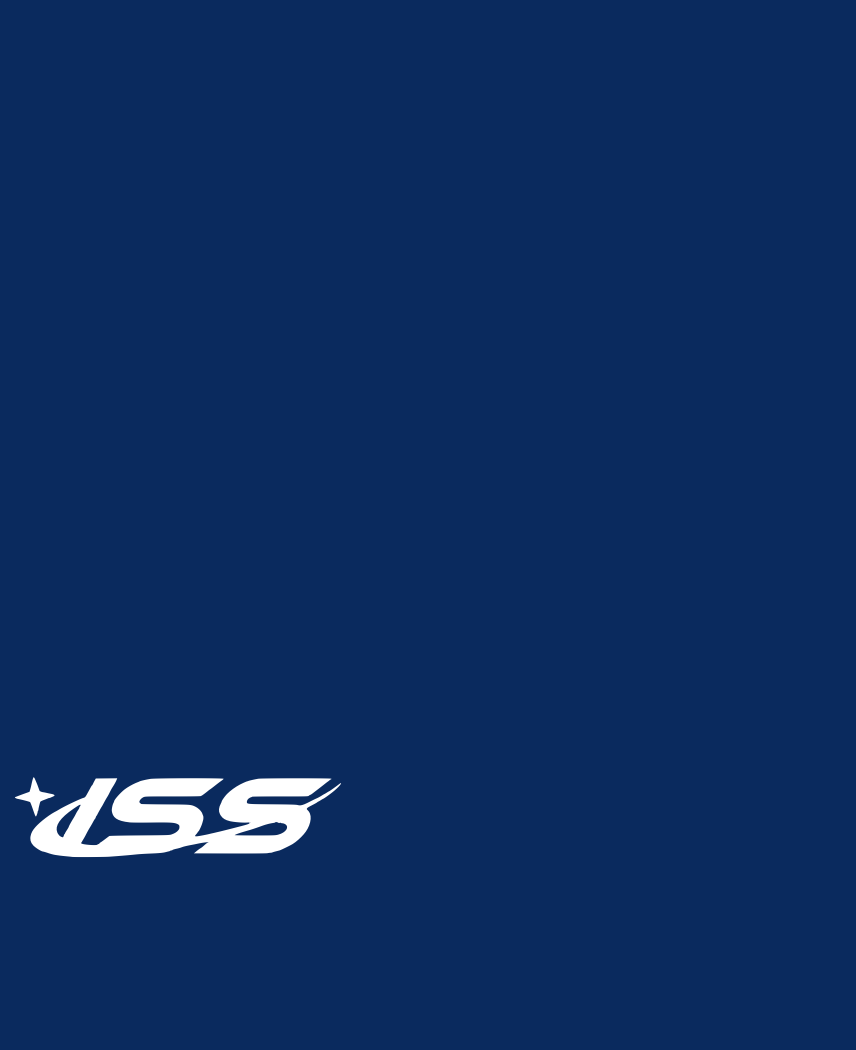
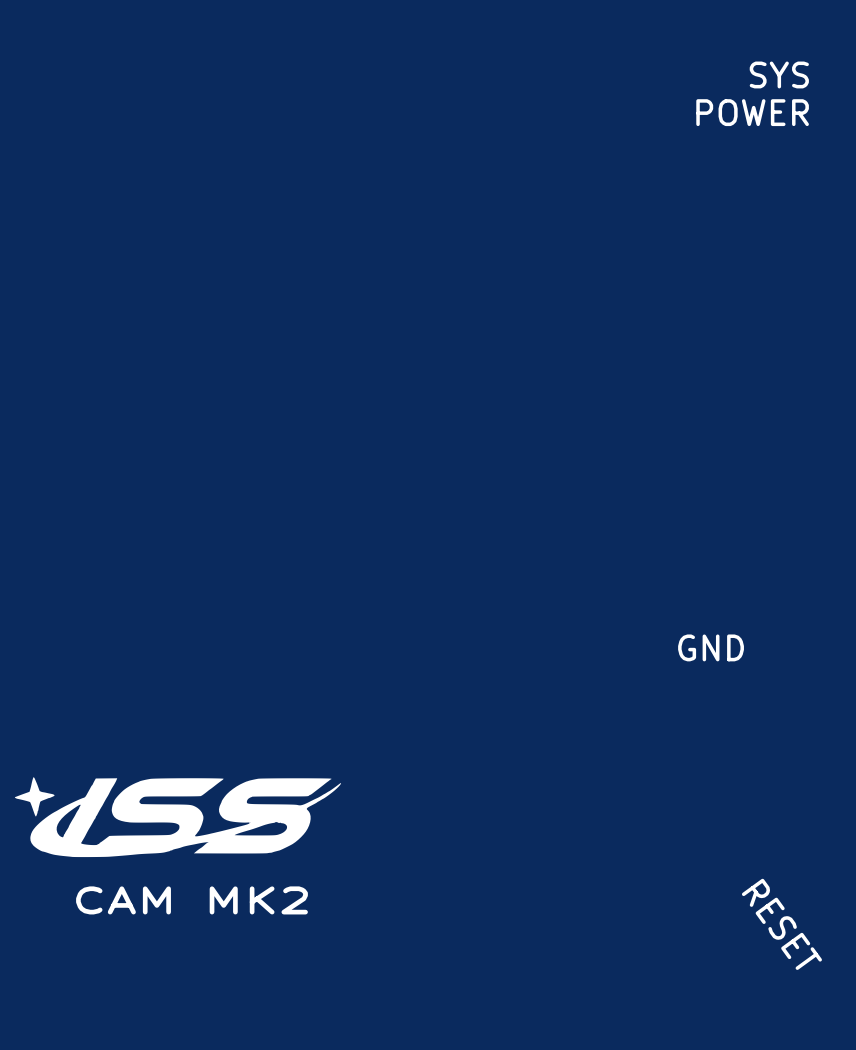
text: none -> SYS (779, 74)
text: none -> POWER (752, 112)
text: none -> GND (711, 647)
text: none -> CAM MK2 (191, 900)
text: none -> RESET (781, 924)

